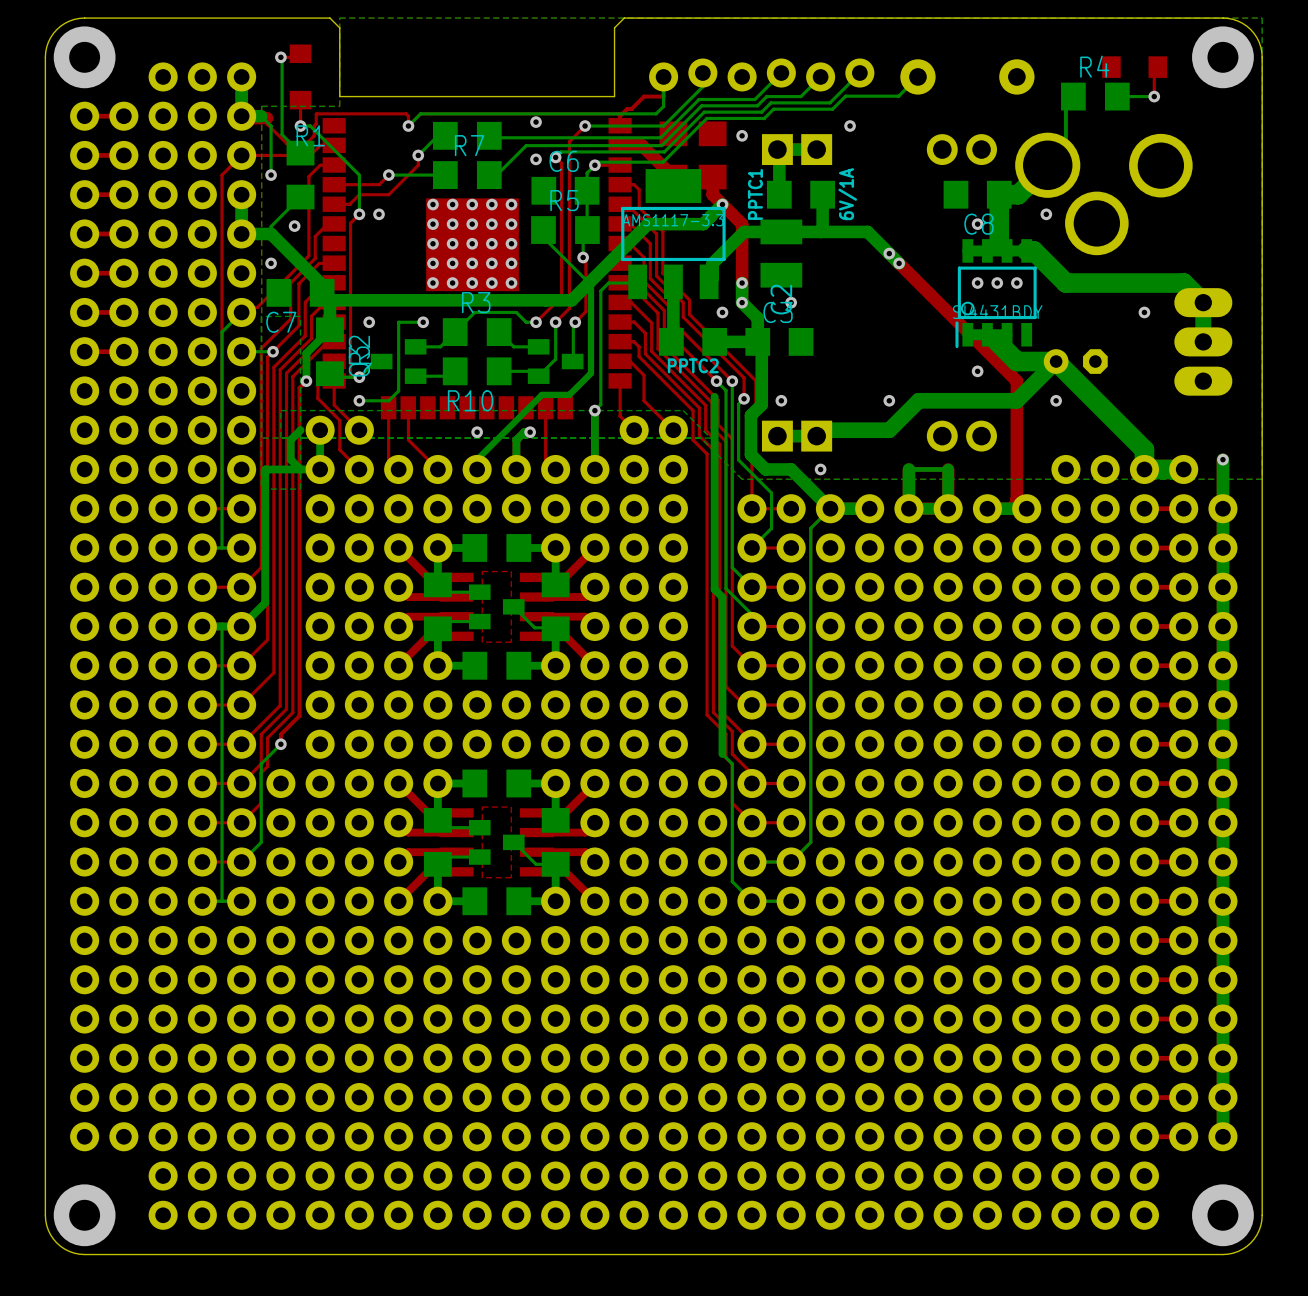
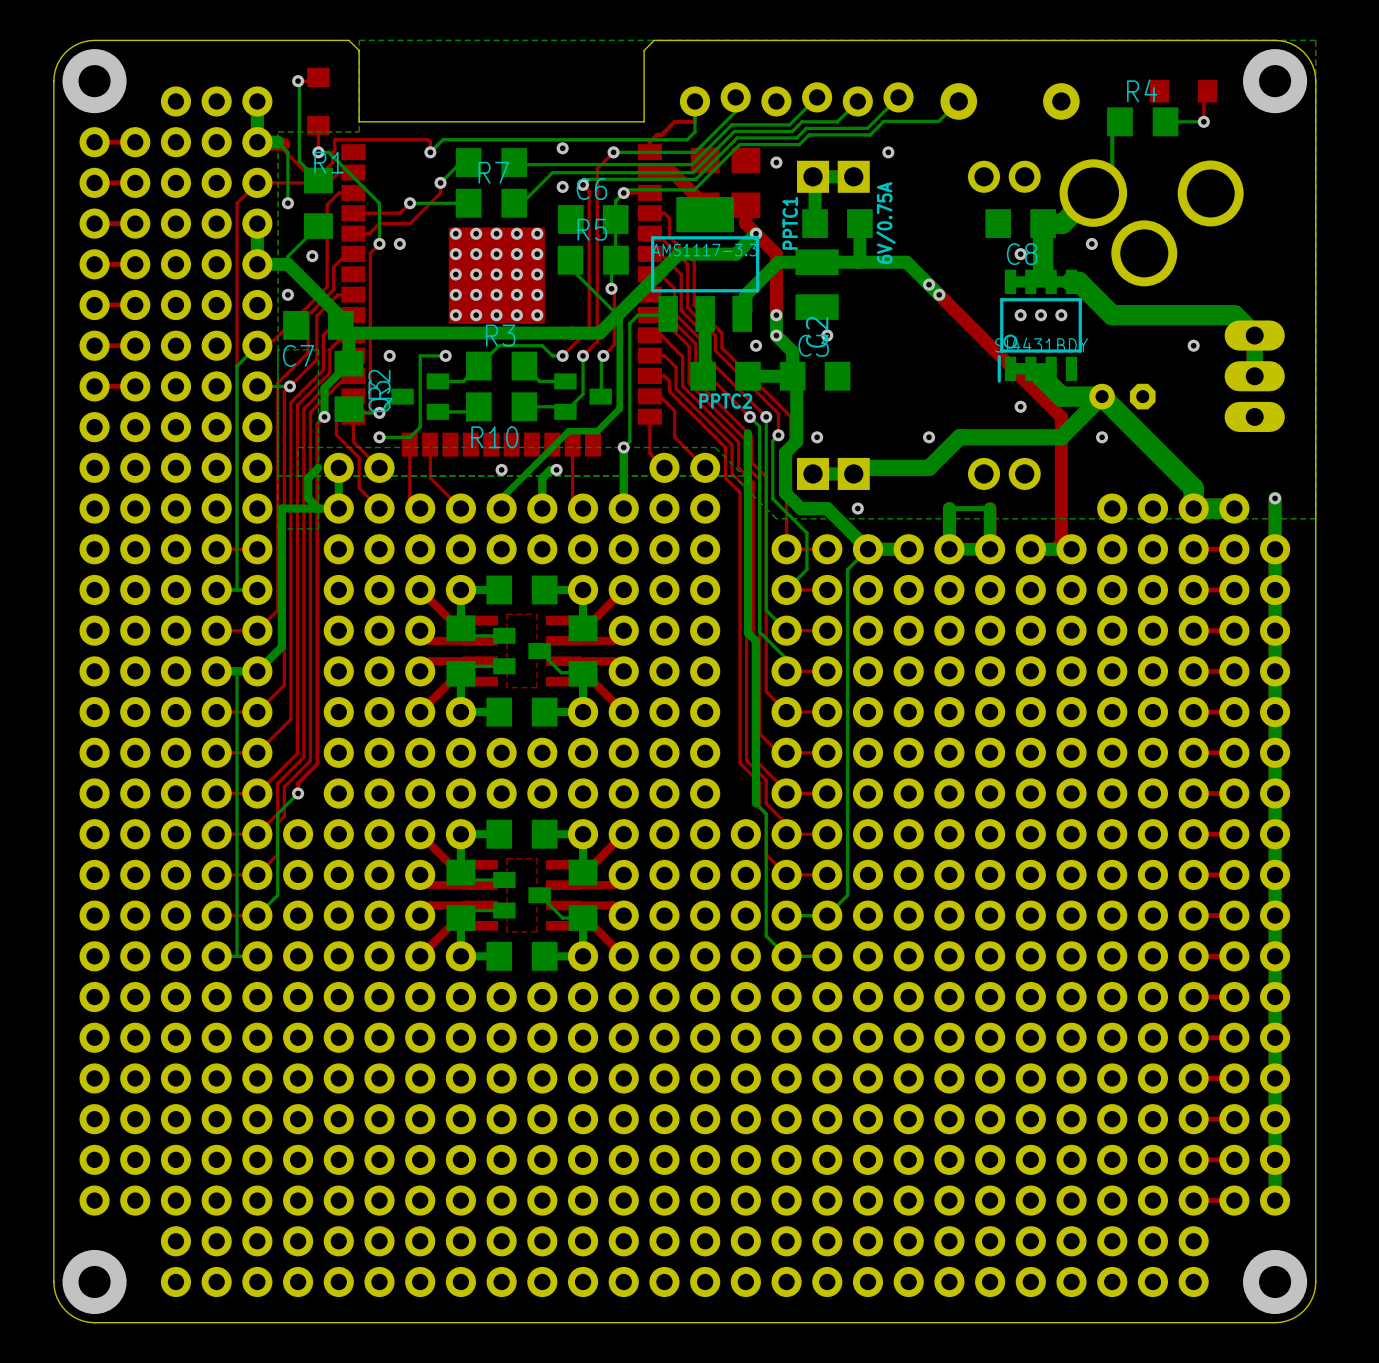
PPTC1 value: 6V/1A (847, 194) -> 6V/0.75A (885, 223)

